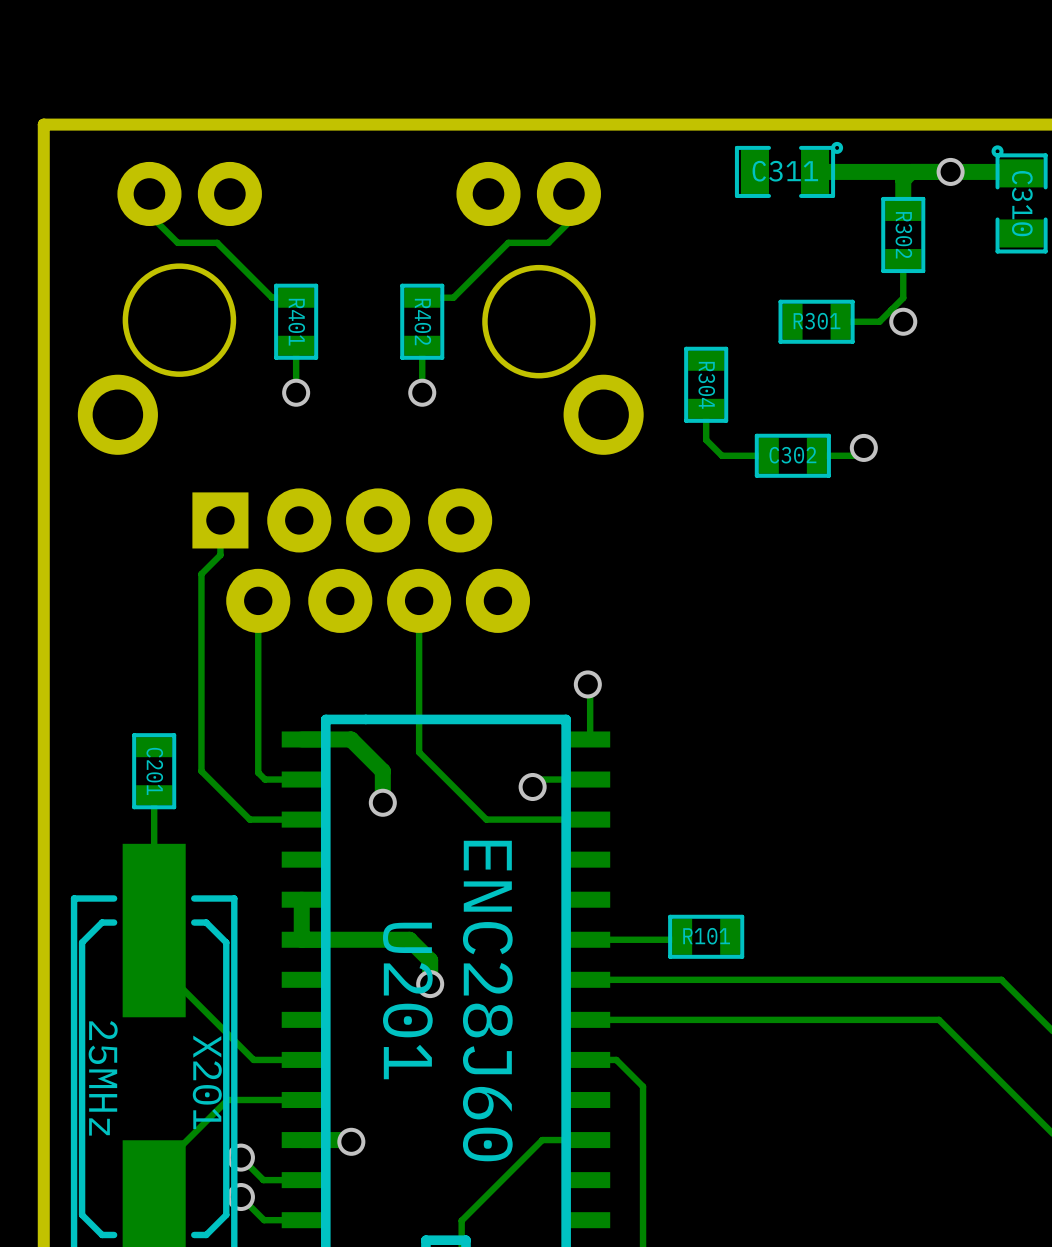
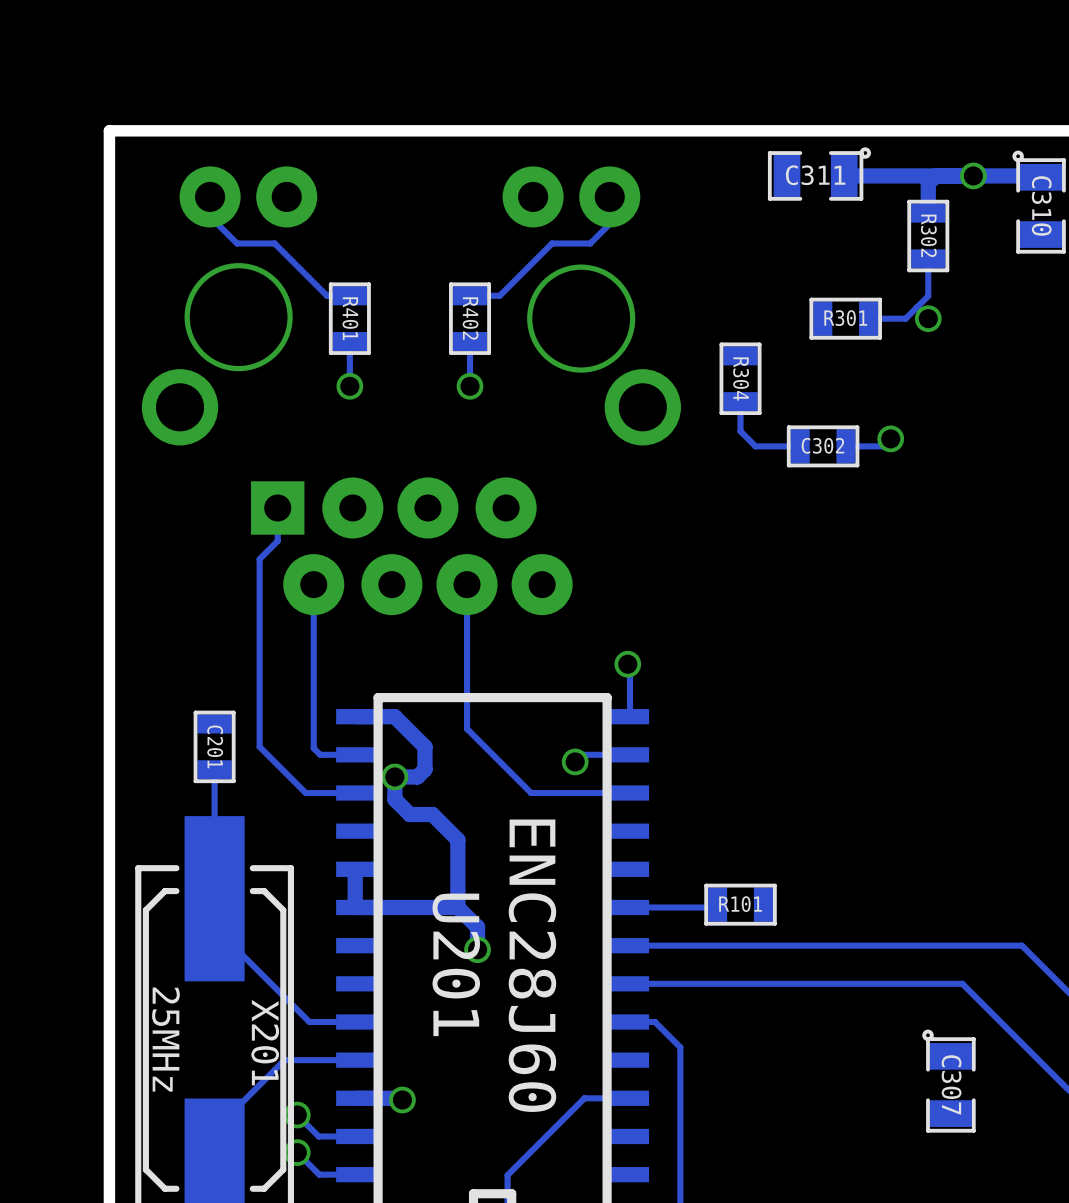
track: (343, 739) (351, 739) (382, 771) (382, 802) -> (394, 716) (424, 746) (424, 769) (417, 776) (394, 776) (394, 799) (409, 814) (432, 814) (457, 839) (457, 907)
via position: (382, 802) -> (394, 776)
C307: none -> (948, 1081)

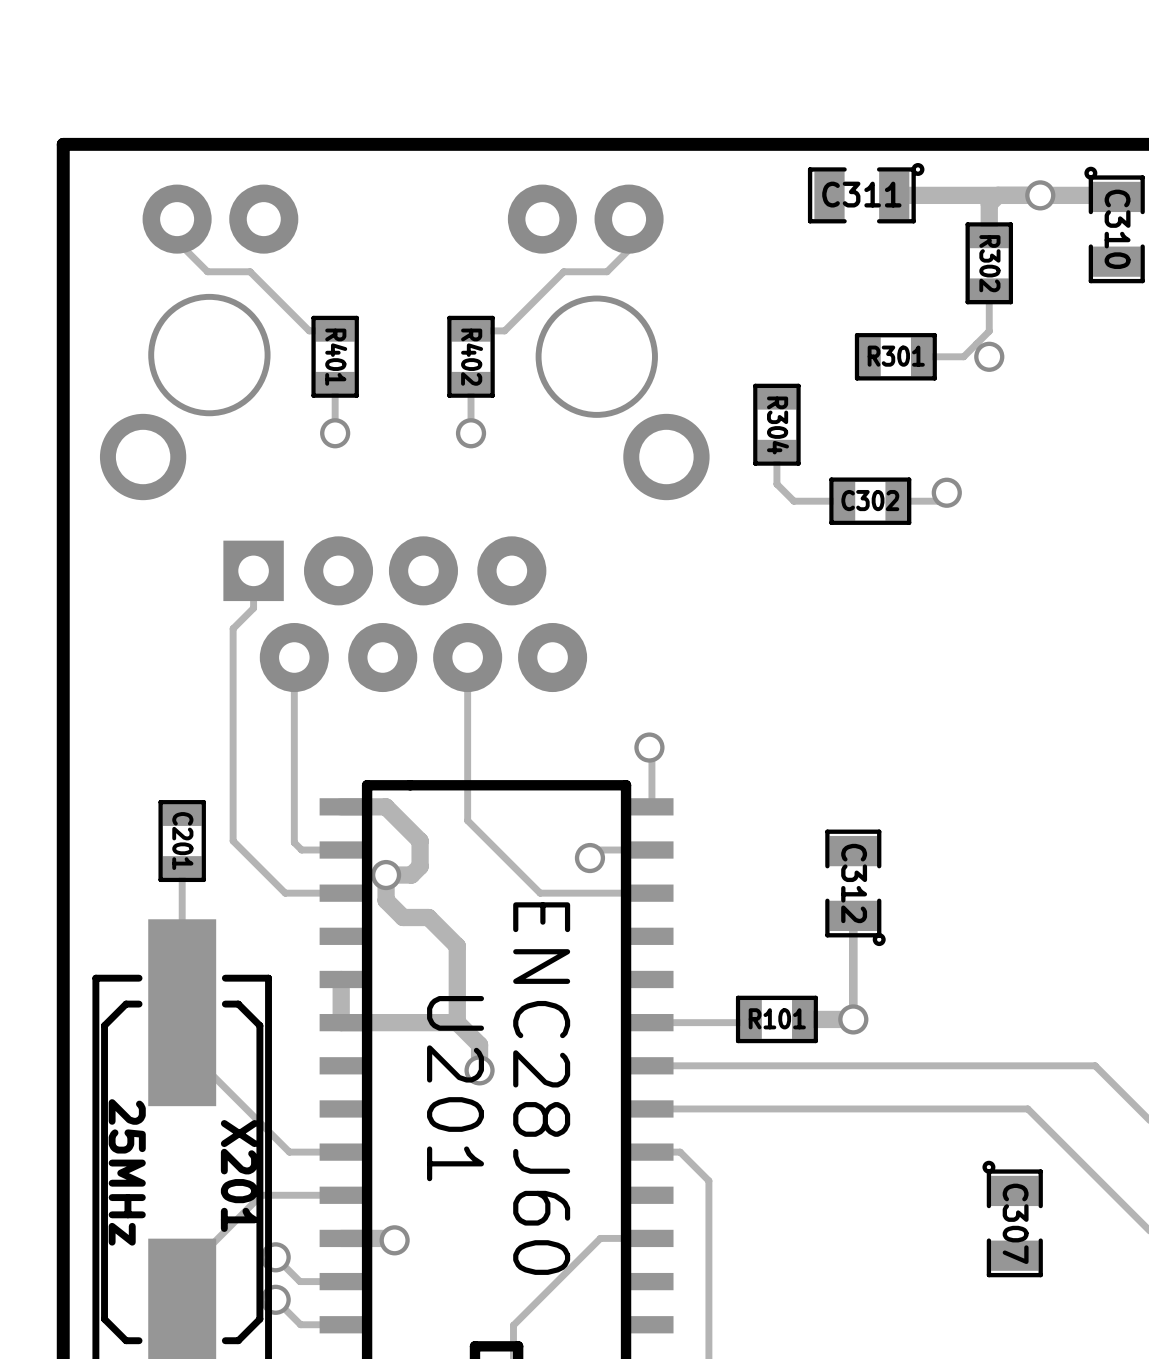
C312: none -> (855, 887)
track: none -> (853, 915) (853, 1019) (802, 1019)
via: none -> (853, 1019)

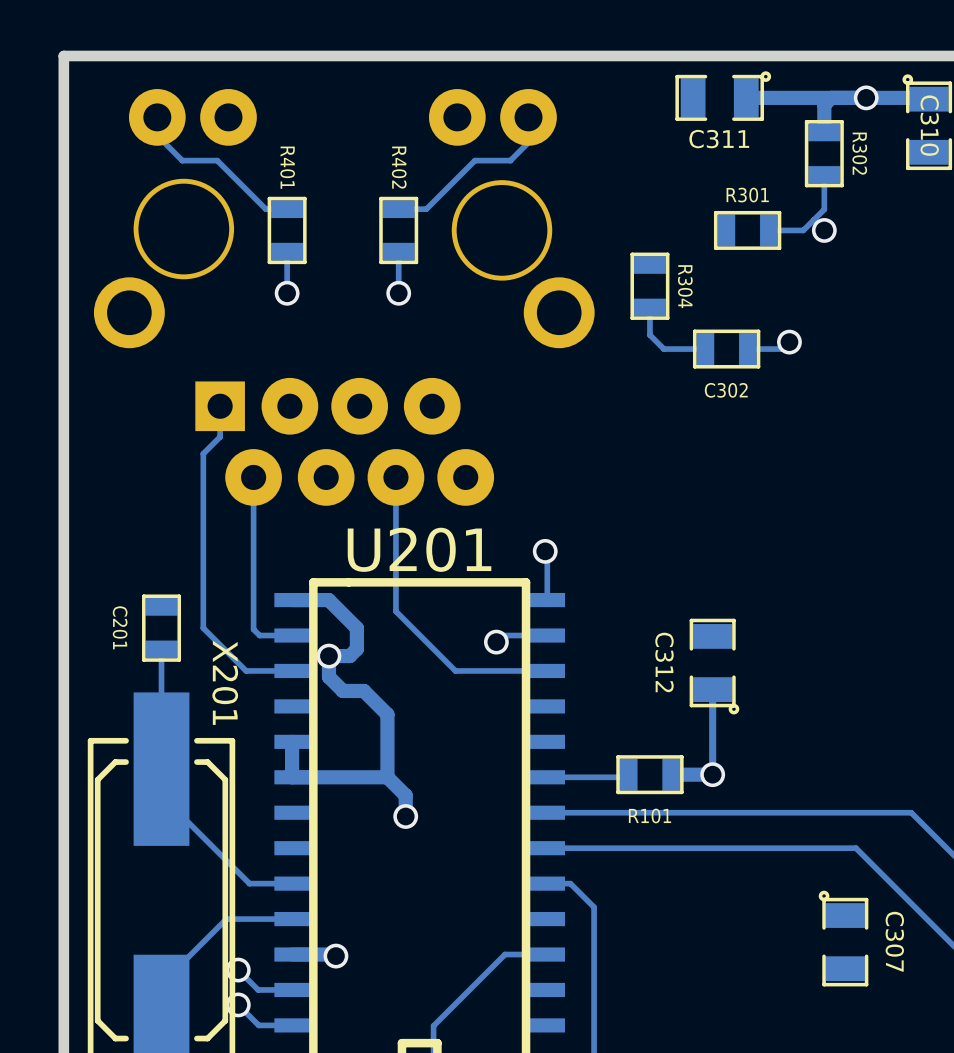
C311 name position: C311 (861, 194) -> C311 (719, 139)
R302 name position: R302 (989, 263) -> R302 (859, 153)
R301 name position: R301 (896, 356) -> R301 (747, 195)
R401 name position: R401 (336, 357) -> R401 (287, 167)
R402 name position: R402 (472, 357) -> R402 (399, 167)
R304 name position: R304 (777, 425) -> R304 (685, 286)
C302 name position: C302 (870, 500) -> C302 (726, 390)
C201 name position: C201 (182, 841) -> C201 (120, 627)
C312 name position: C312 (854, 883) -> C312 (664, 662)
R101 name position: R101 (777, 1018) -> R101 (649, 815)
U201 name rotation: 0° (455, 1088) -> 90° counterclockwise (419, 549)
U201 name position: U201 (455, 1088) -> U201 (419, 549)
U201 value: ENC28J60 (541, 1088) -> none
X201 value: 25MHz (127, 1172) -> none
X201 name position: X201 (239, 1175) -> X201 (225, 682)
C307 name position: C307 (1015, 1223) -> C307 (894, 941)

